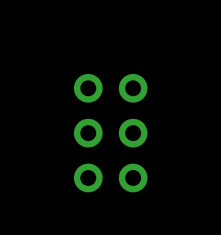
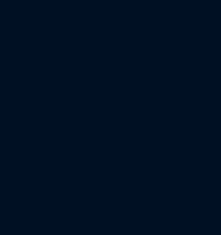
part: (110, 133) -> none

